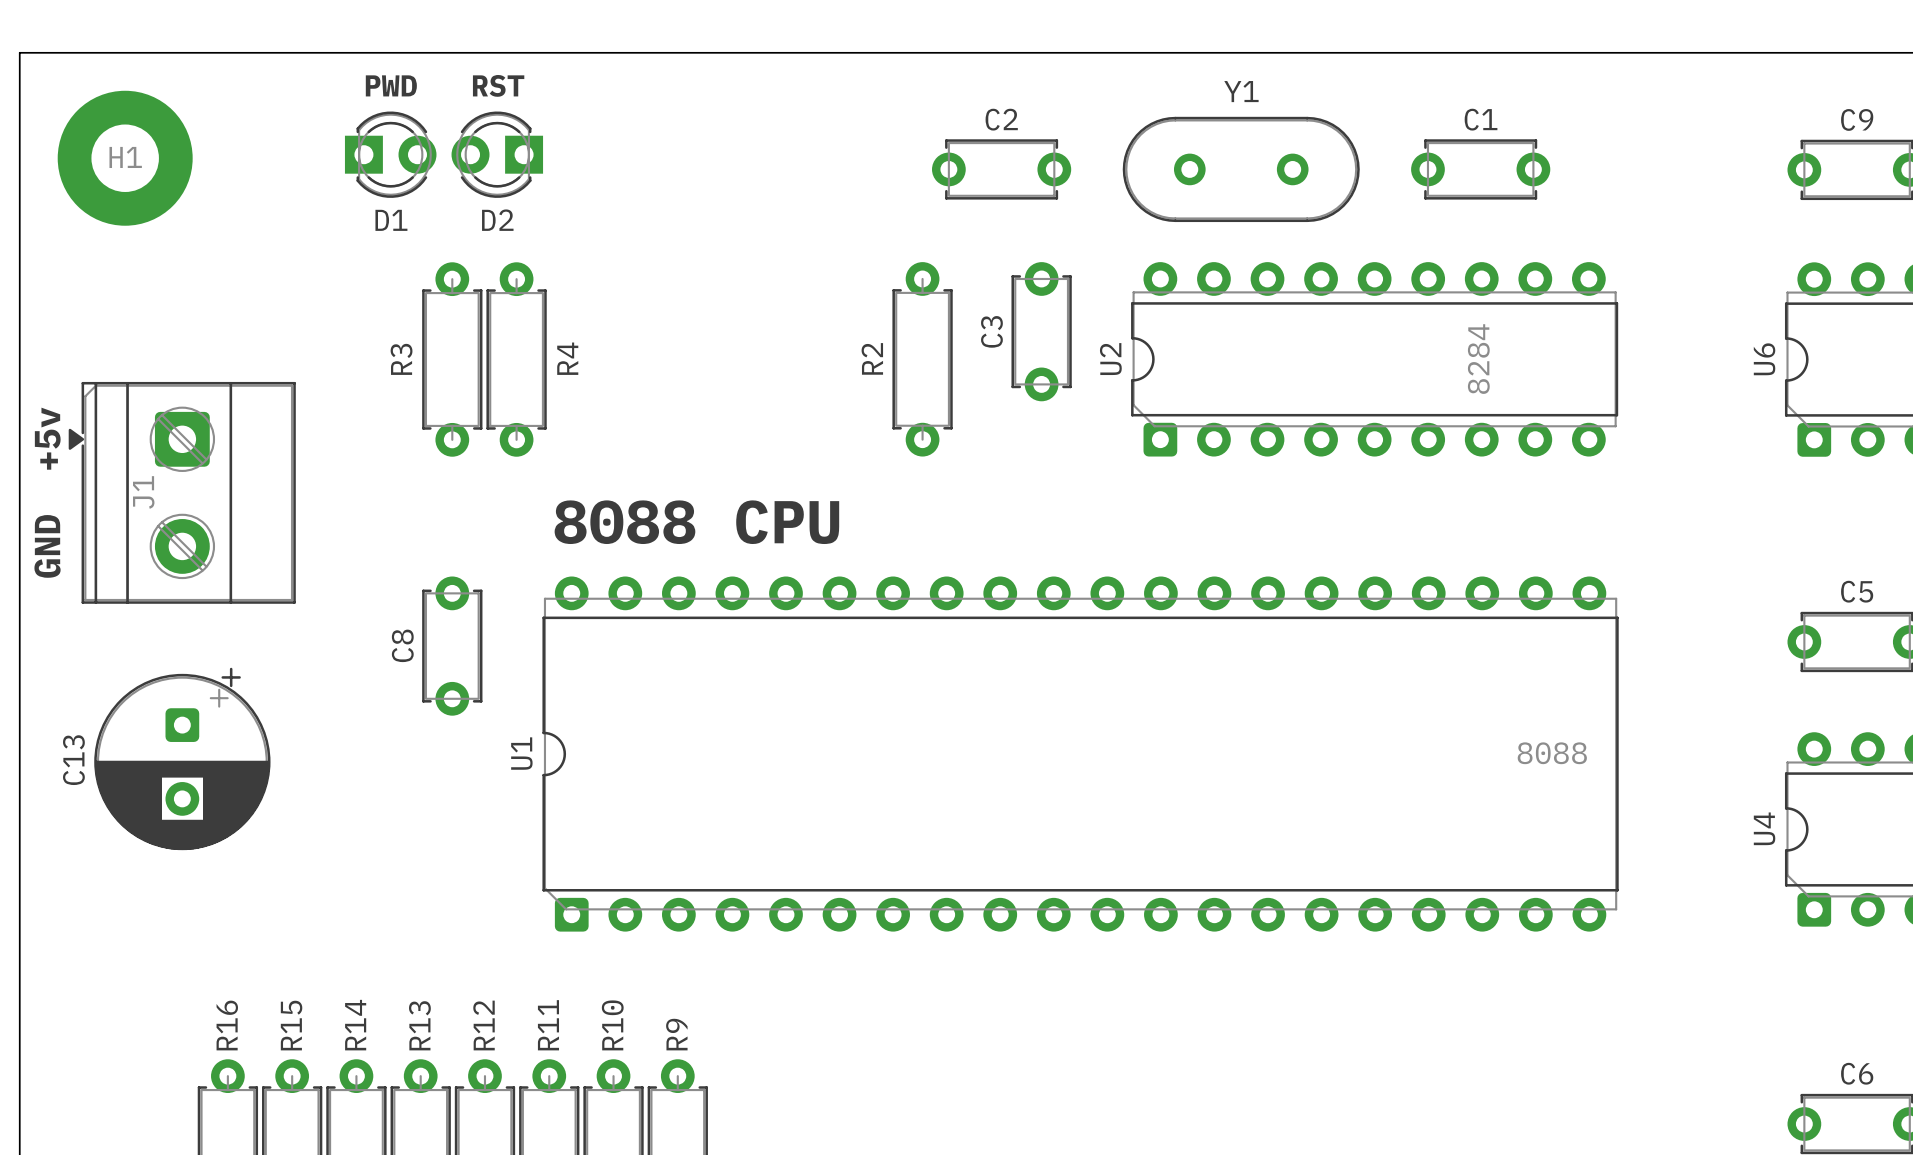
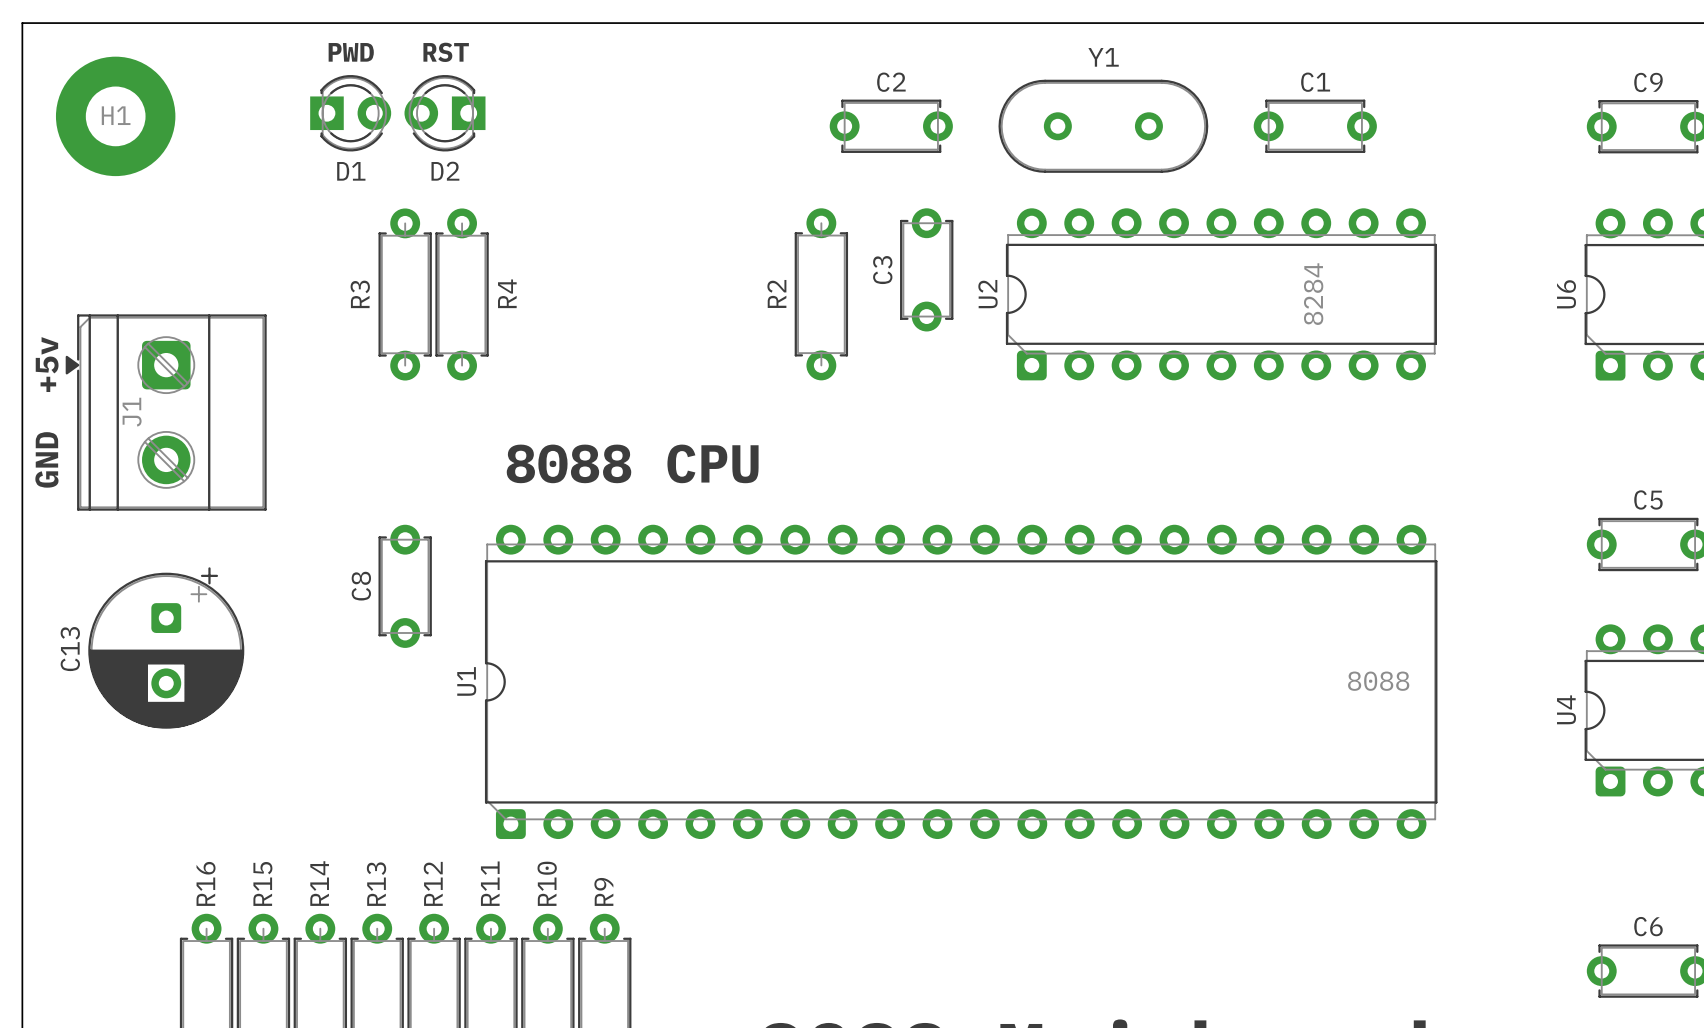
text position: 8088 CPU (696, 522) -> 8088 CPU (632, 463)
C8 position: (452, 646) -> (405, 586)
U1 position: (1080, 754) -> (961, 681)

